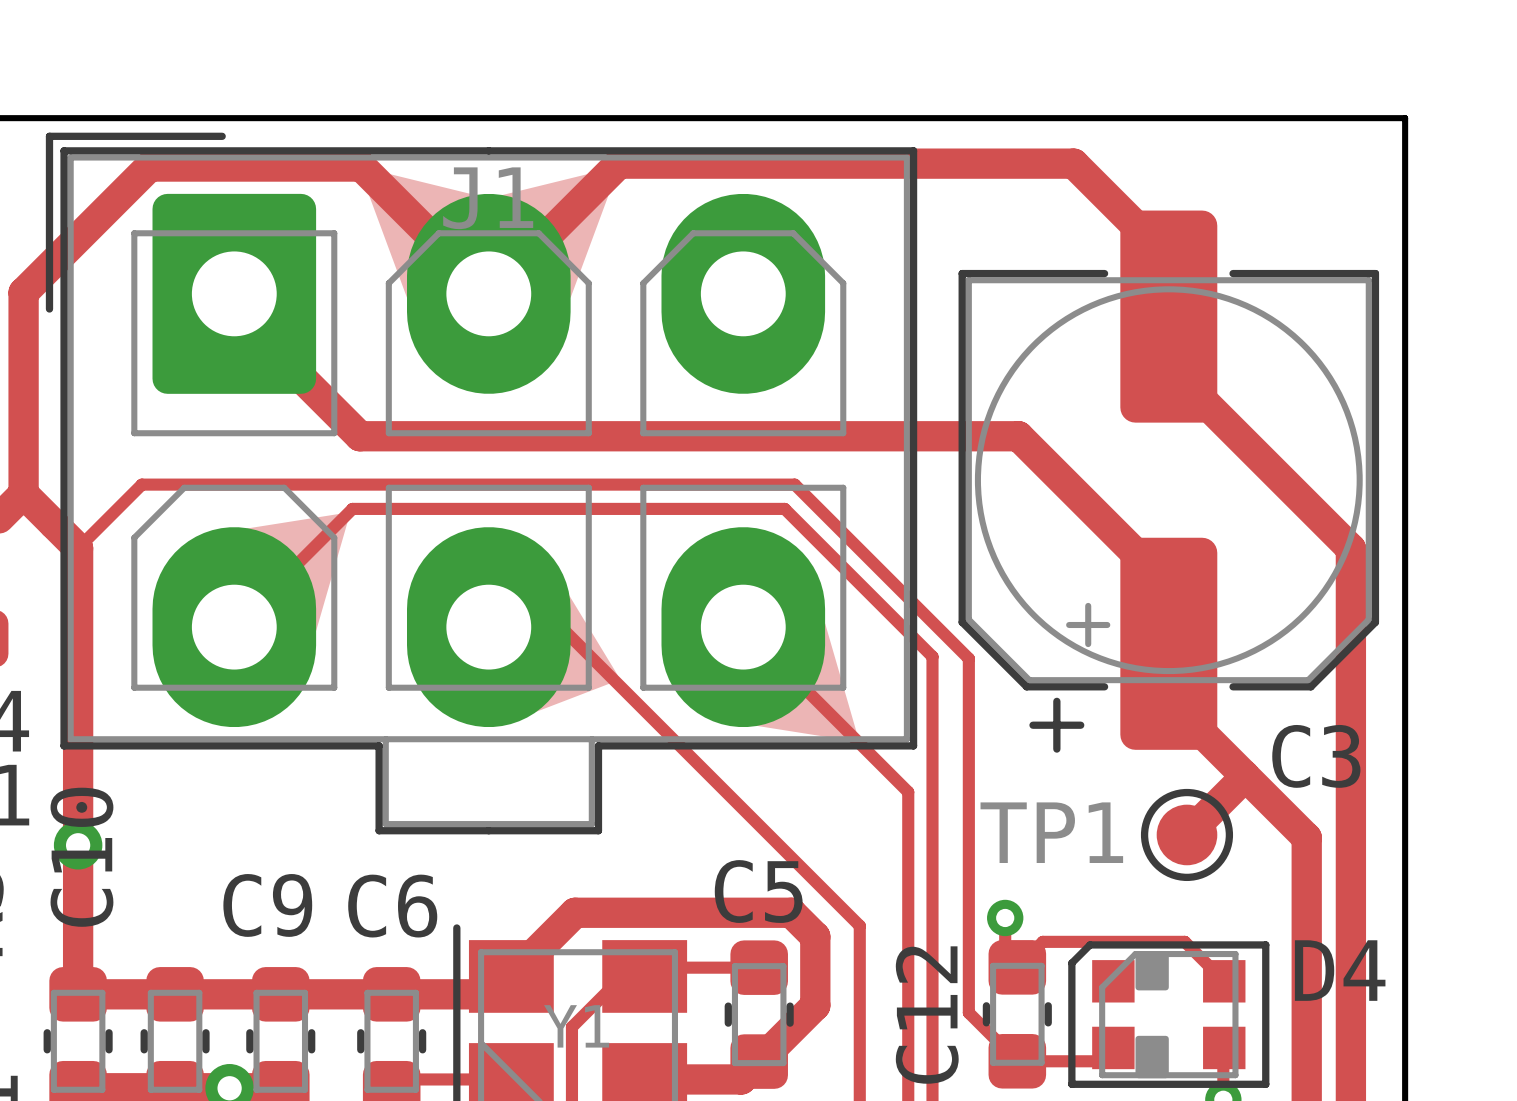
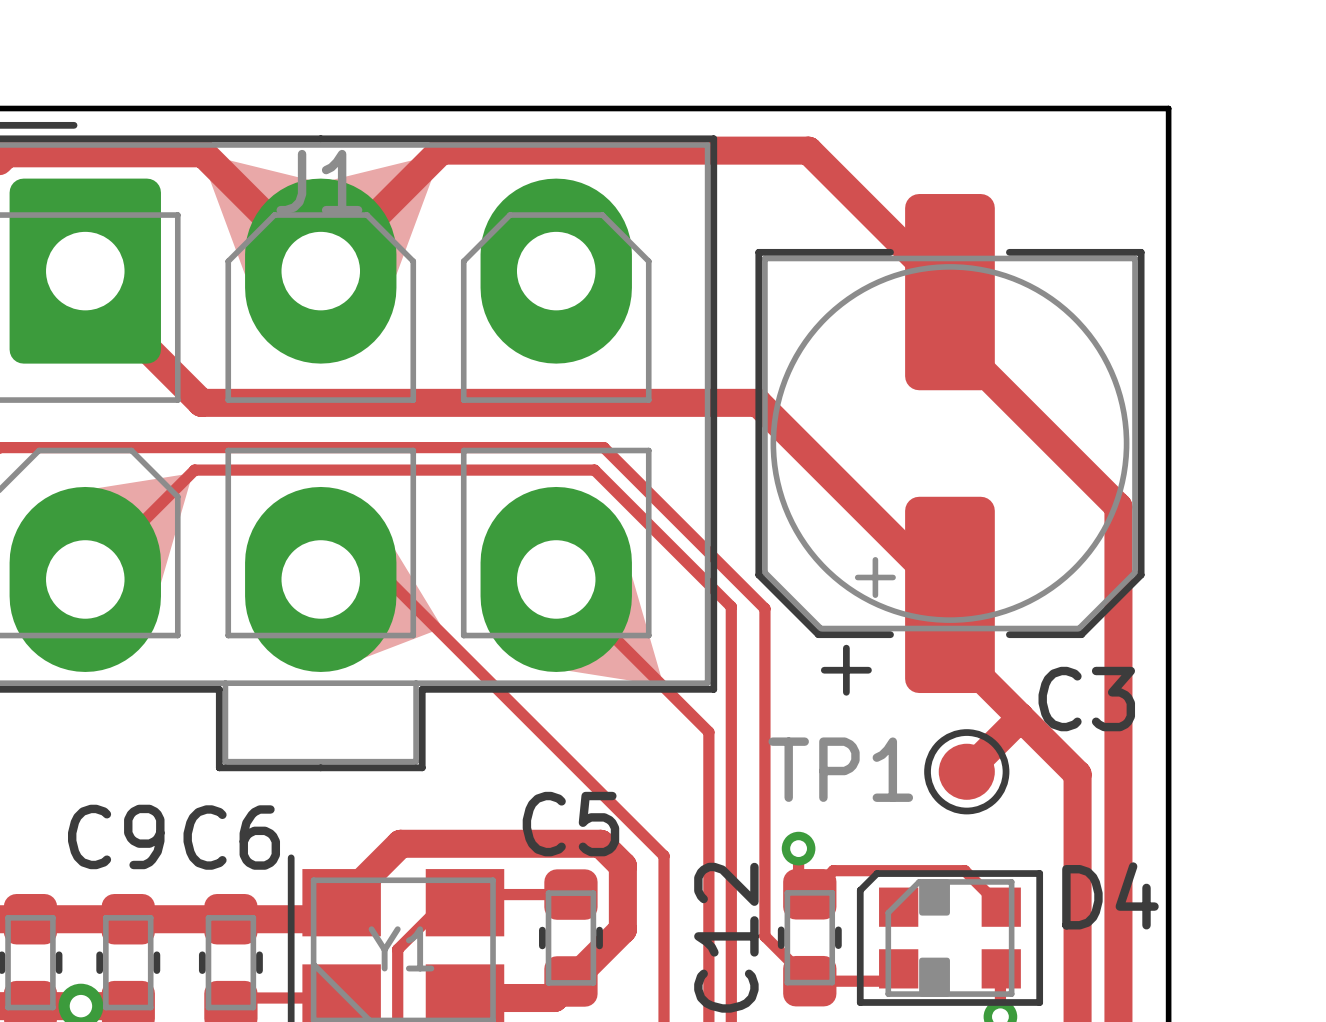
track: (1015, 163) (1073, 163) (1168, 258) (1168, 316) -> (808, 150) (949, 292)
track: (961, 436) (1018, 436) (1168, 586) (1168, 643) -> (757, 402) (949, 594)

